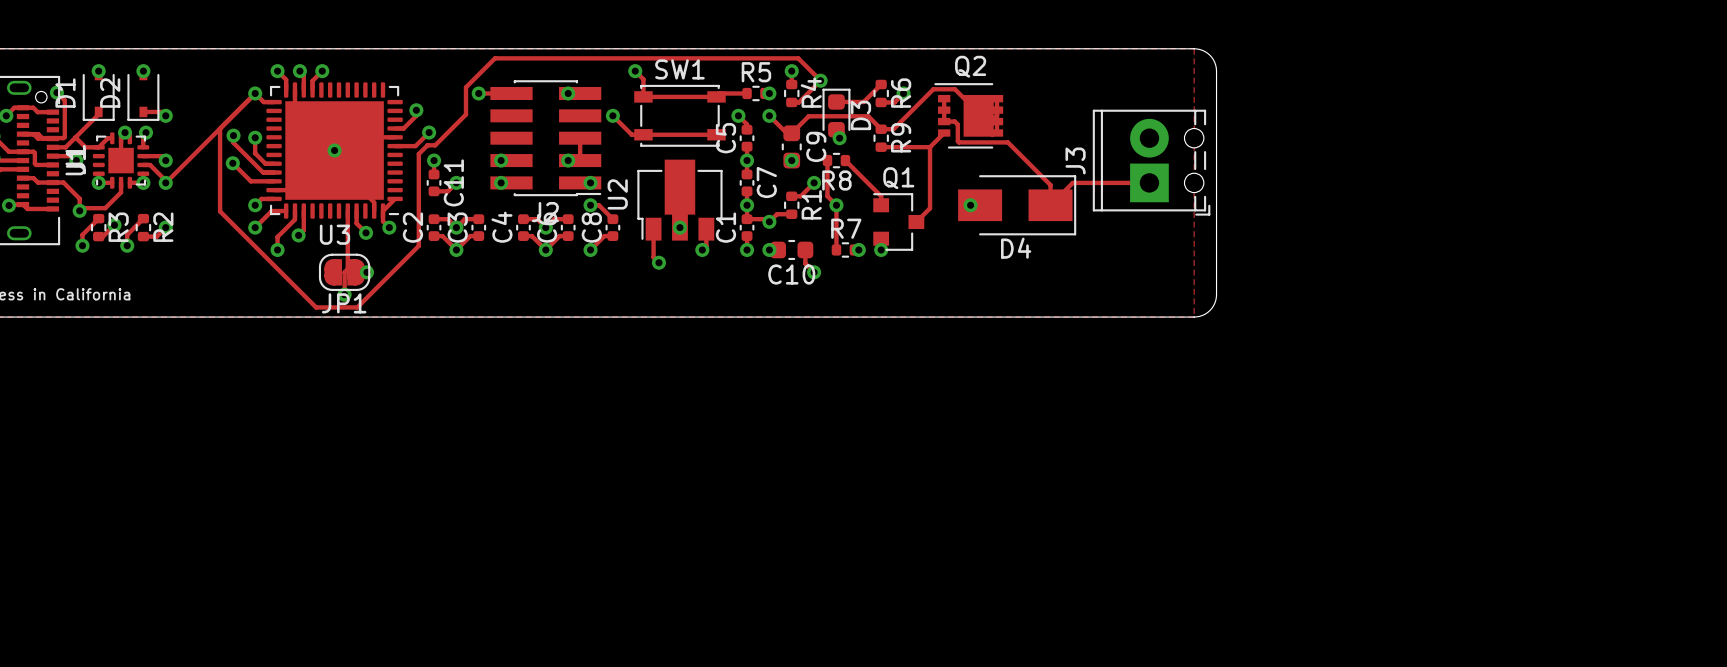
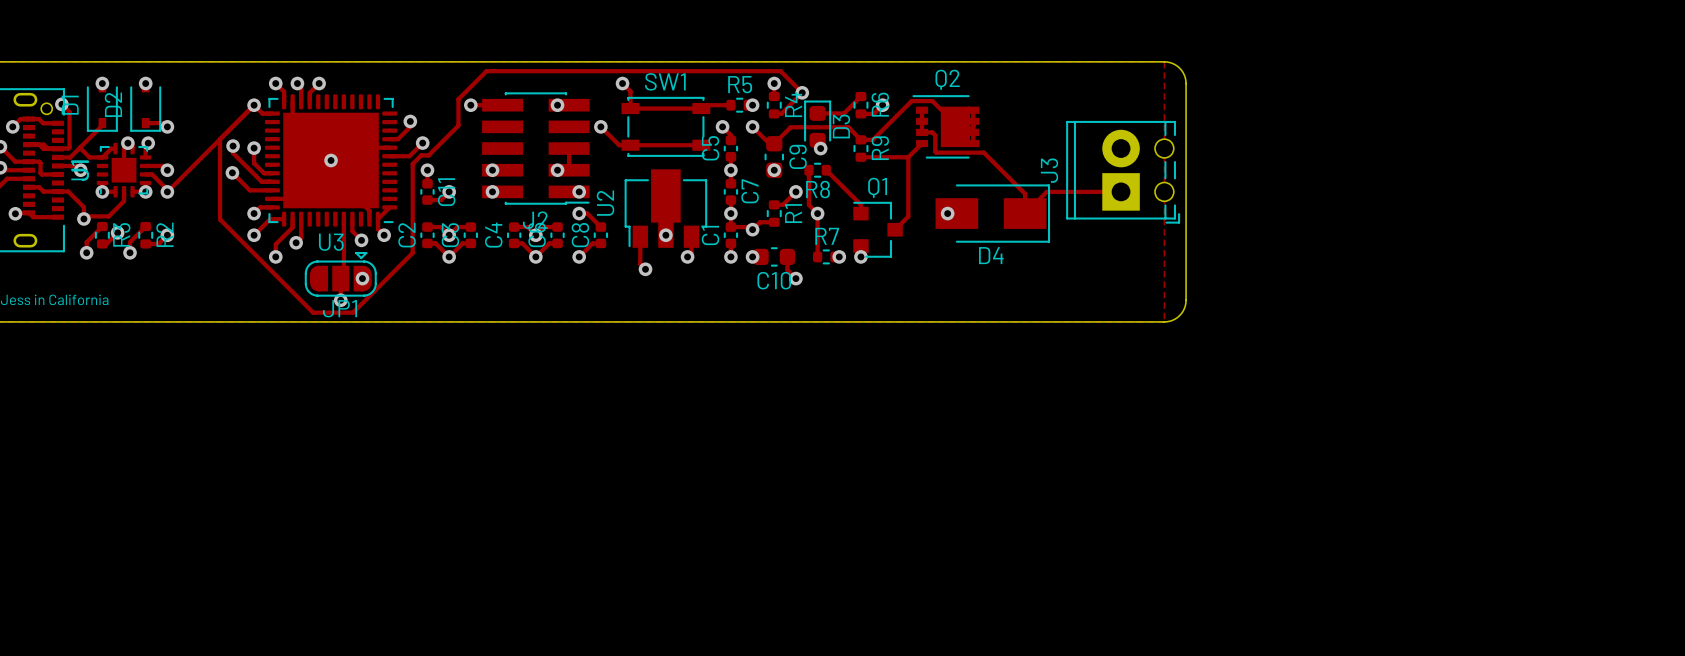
JP1 footprint: [318, 253, 371, 291] -> [304, 251, 377, 297]

